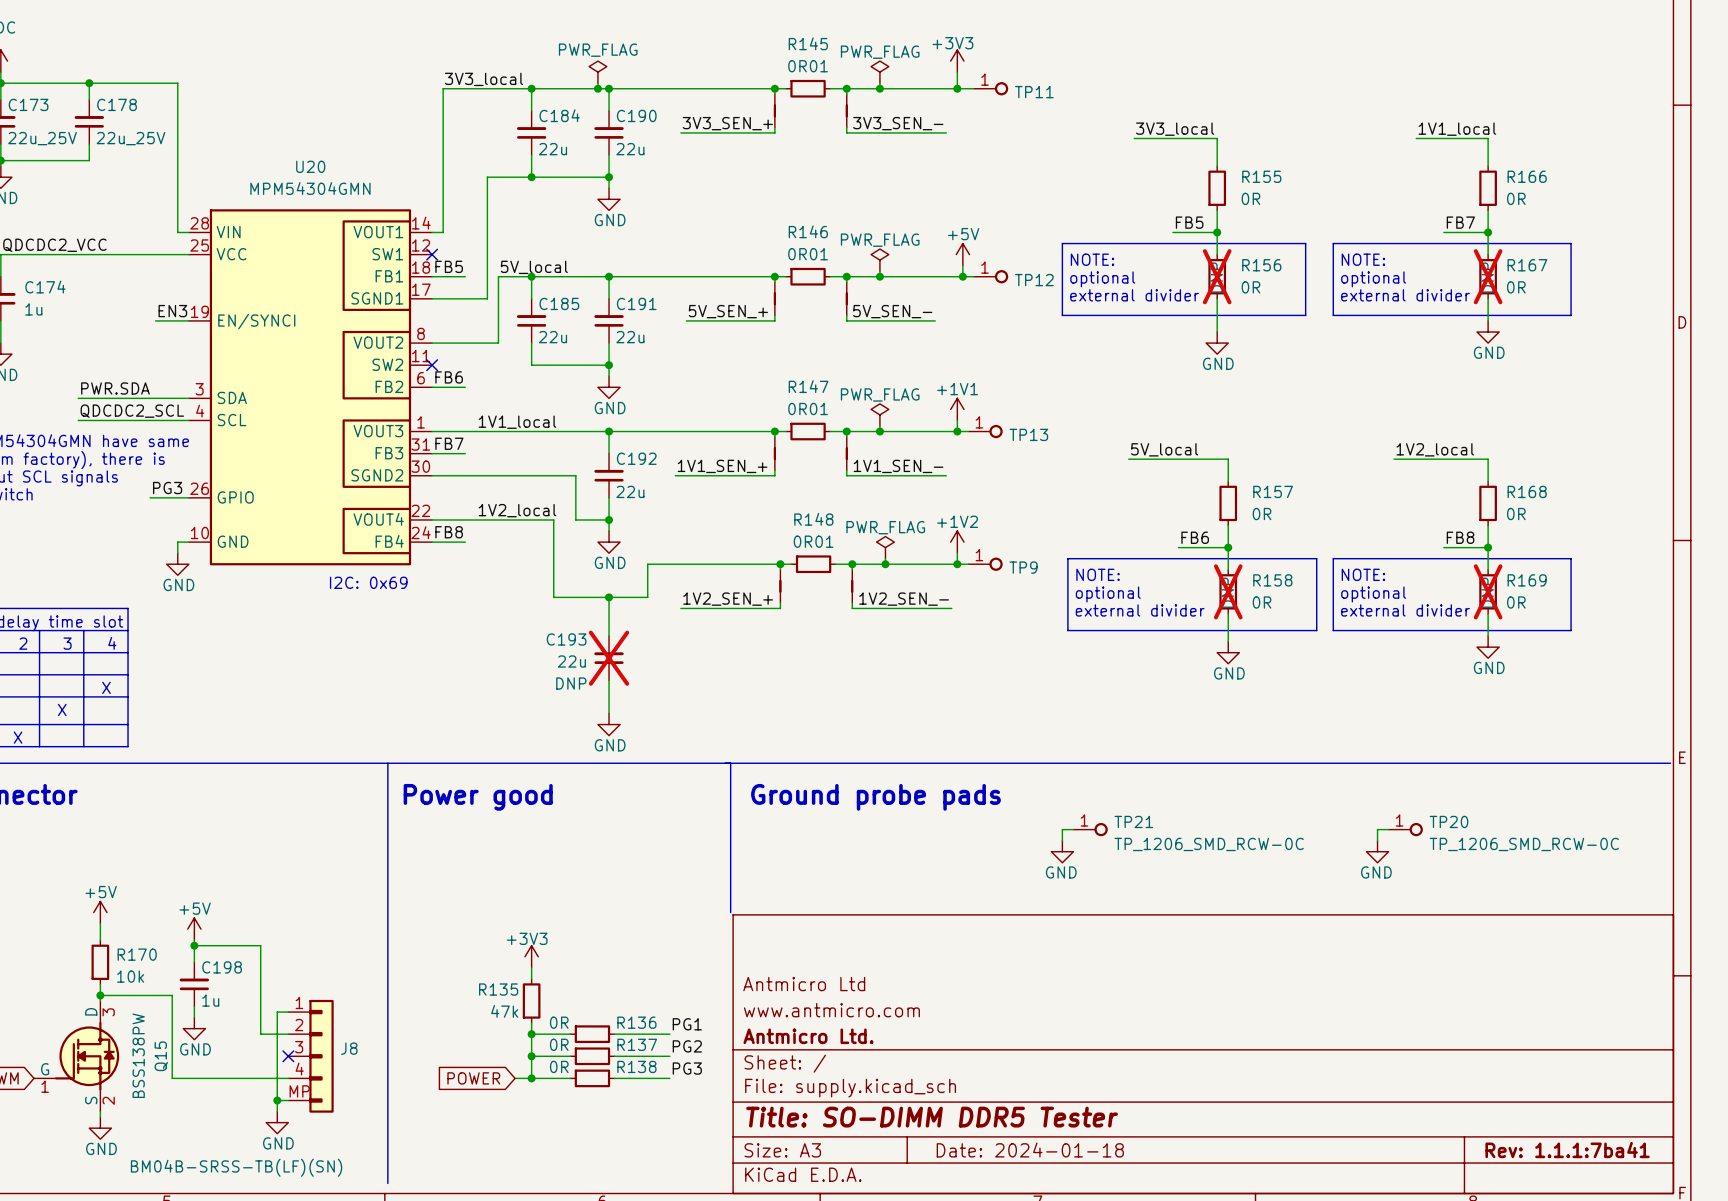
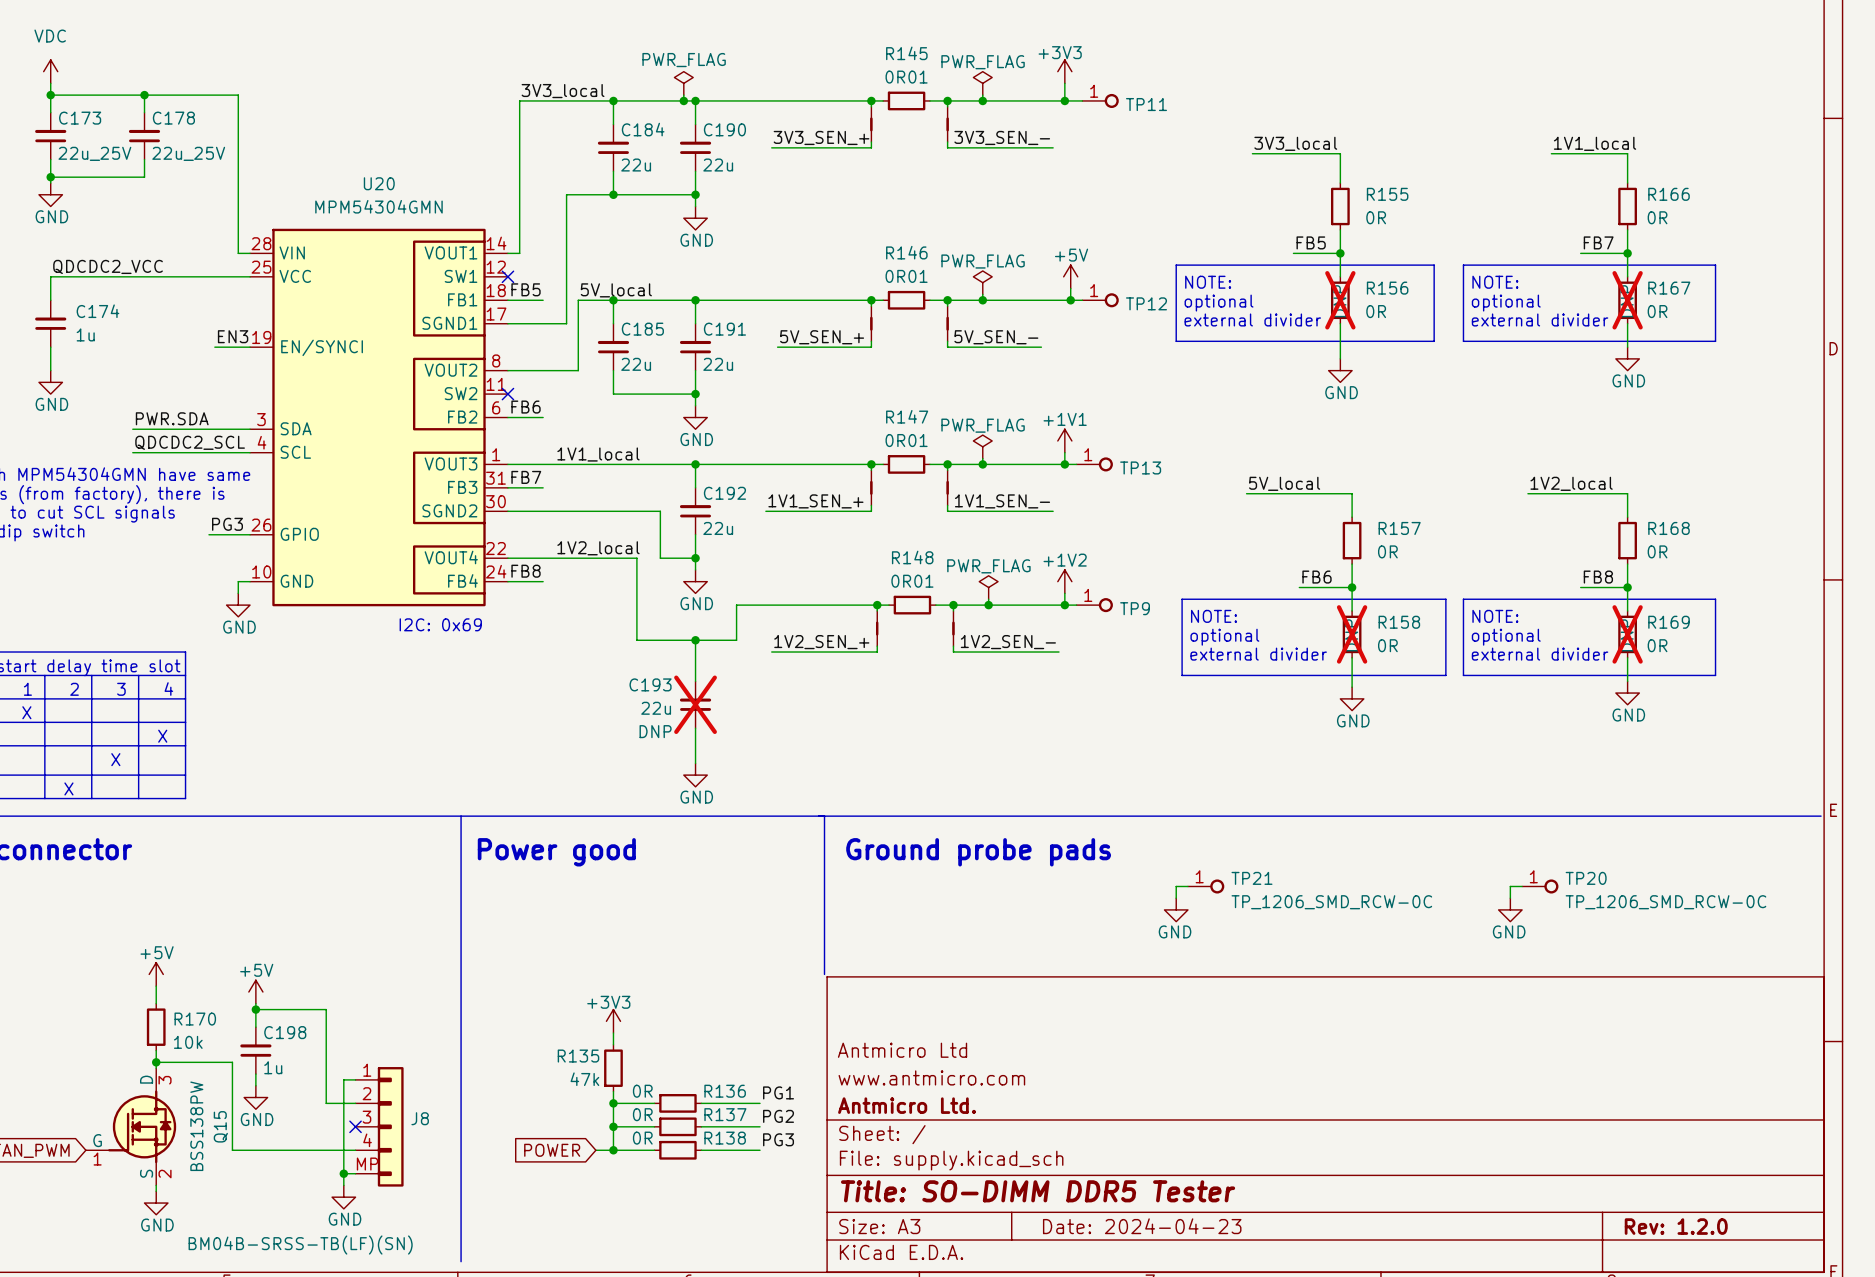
title block: Date: 2024-01-18 (1030, 1150) -> Date: 2024-04-23 (1142, 1226)
title block: Rev: 1.1.1:7ba41 (1567, 1150) -> Rev: 1.2.0 (1676, 1226)

